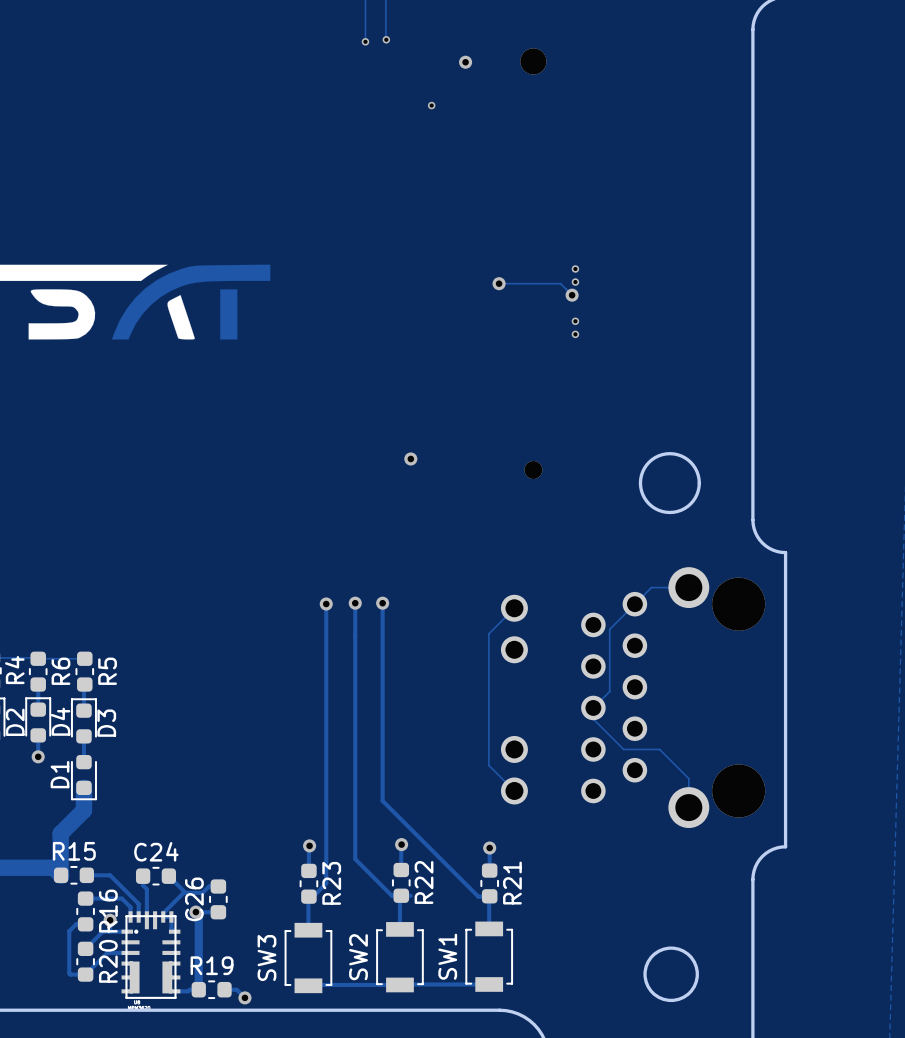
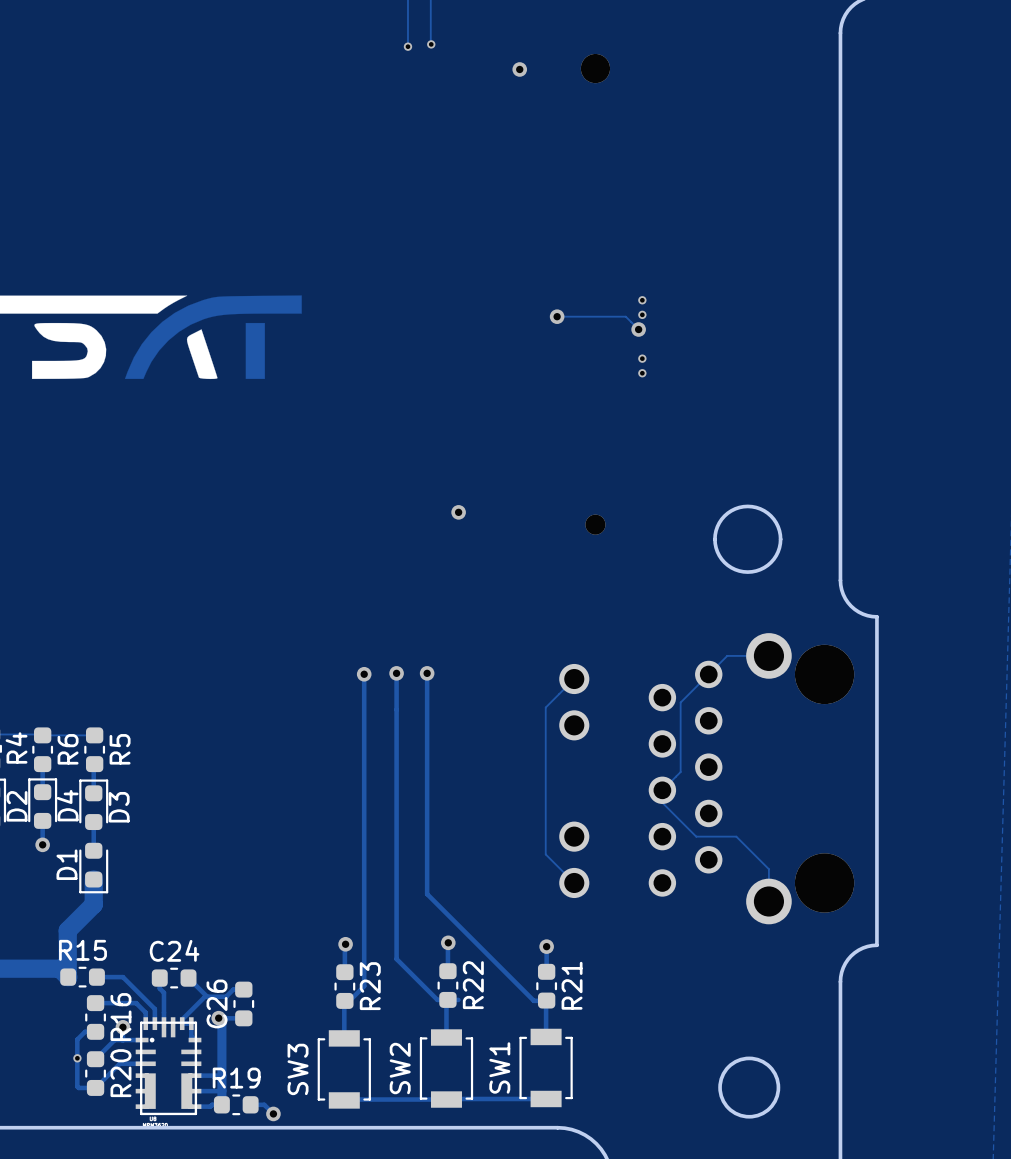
via: (431, 105) -> none
via: none -> (77, 1058)
track: none -> (198, 1075) (221, 1075)
track: none -> (198, 1091) (221, 1091)

